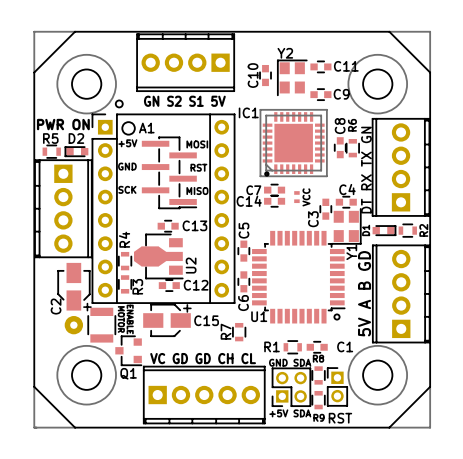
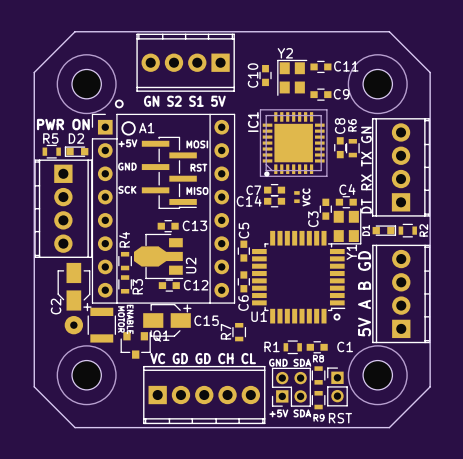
line: (75, 31) (34, 31) (34, 72) -> none
line: (389, 31) (430, 31) (430, 72) -> none
text rotation: 0° (248, 112) -> 90° counterclockwise (253, 122)
Q1 rotation: 0° (128, 350) -> 90° counterclockwise (135, 345)
line: (34, 386) (34, 427) (75, 427) -> none
line: (430, 386) (430, 427) (389, 427) -> none

